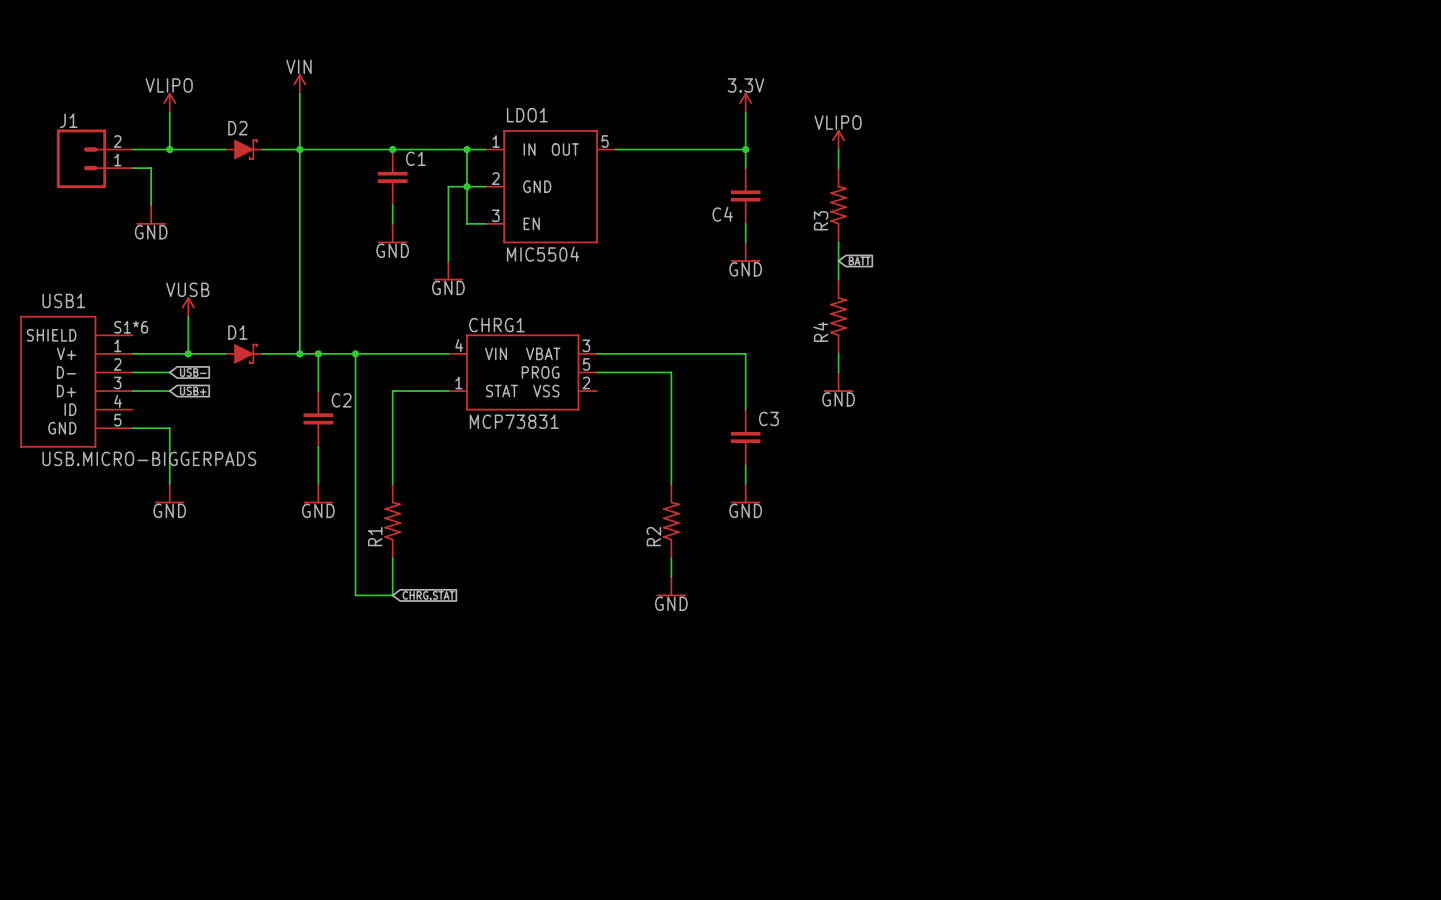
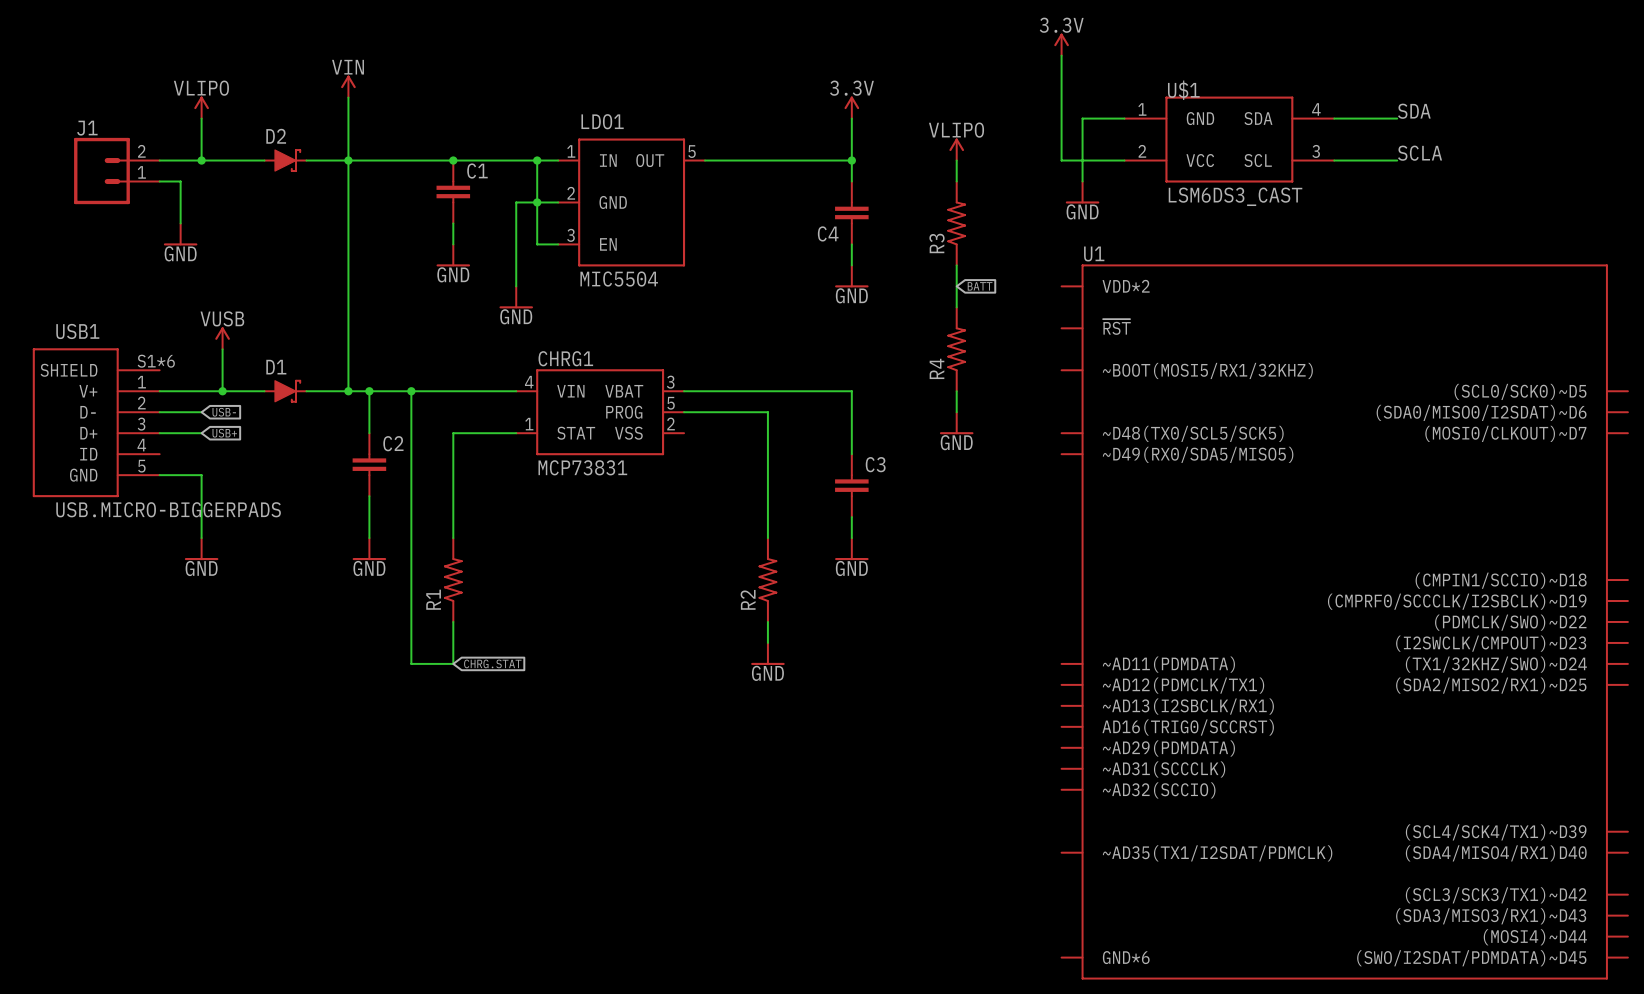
power symbol: none -> 3.3V (1061, 44)
wire: none -> (1061, 55) (1061, 160) (1124, 160)
label: none -> SDA (1414, 111)
wire: none -> (1124, 118) (1082, 118) (1082, 181)
wire: none -> (1334, 118) (1397, 118)
U$1: none -> LSM6DS3_CAST (1229, 139)
label: none -> SCLA (1420, 153)
wire: none -> (1334, 160) (1397, 160)
power symbol: none -> GND (1082, 192)
U1: none -> (1344, 621)

